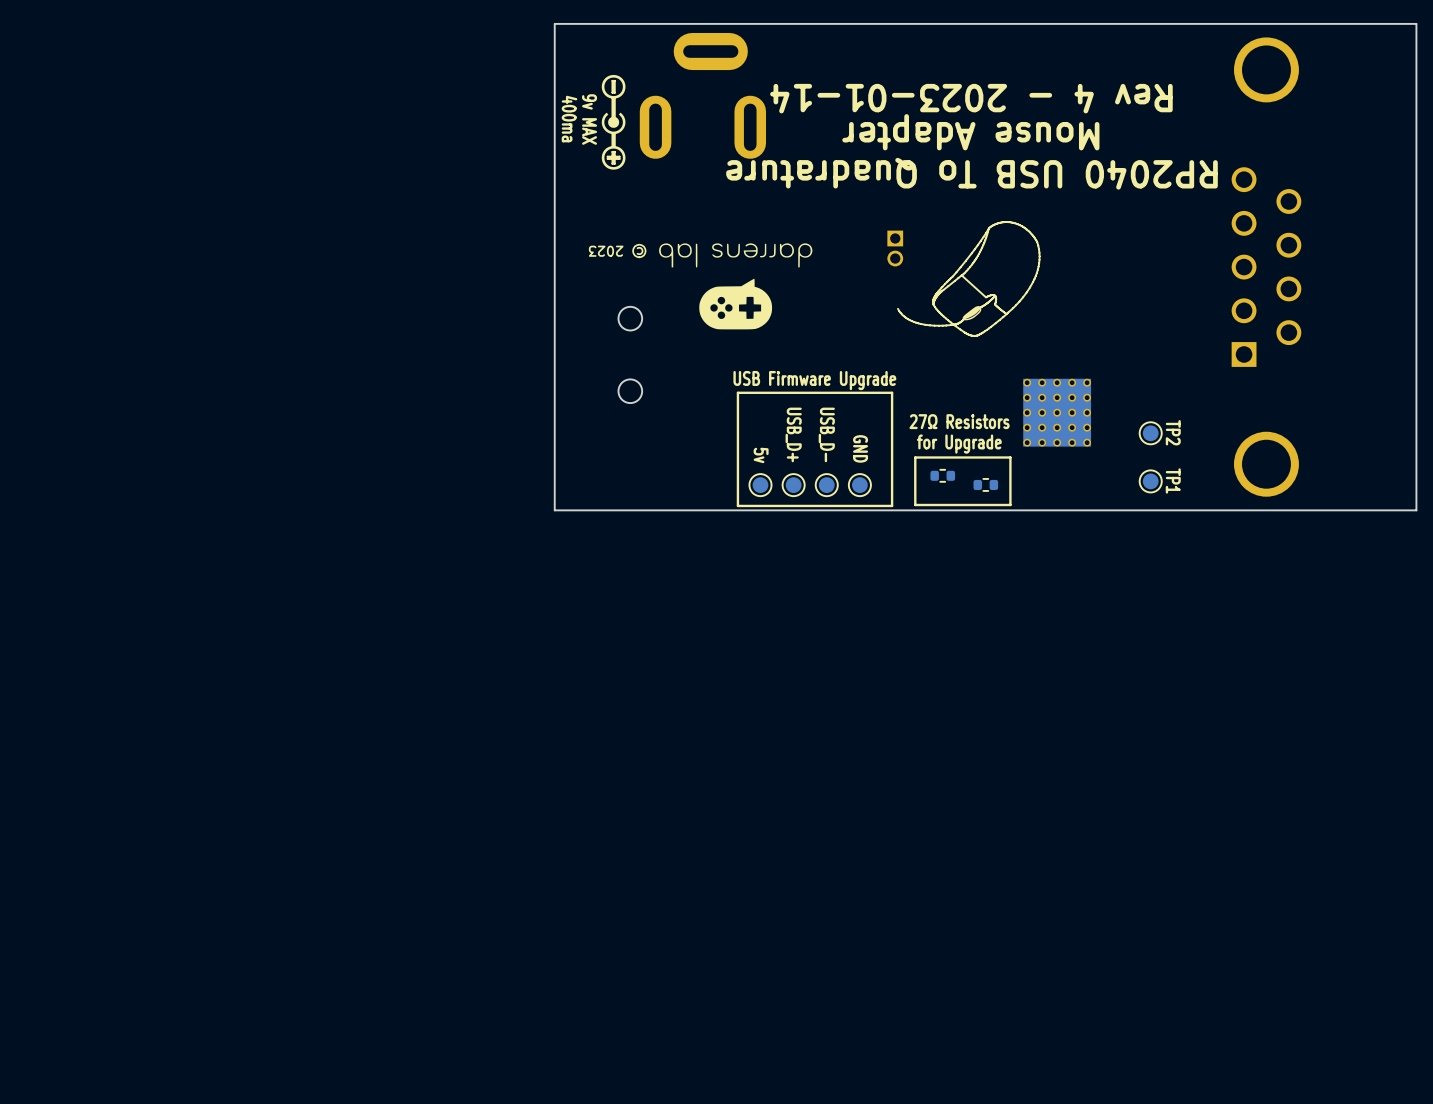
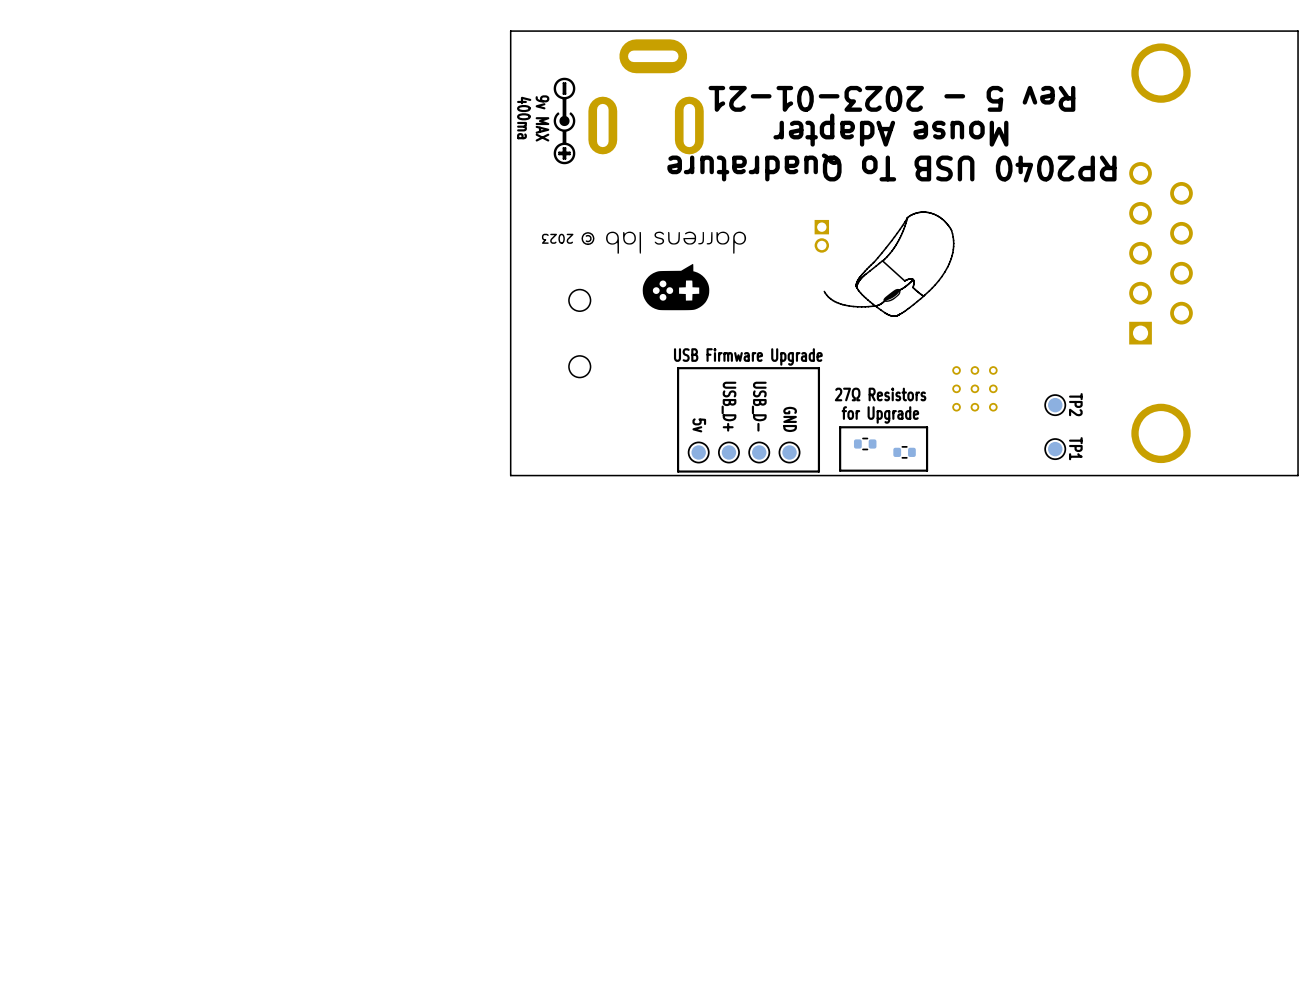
text: Rev 4 - 2023-01-14 (971, 98) -> Rev 5 - 2023-01-21 (891, 98)
part footprint: [1023, 378, 1092, 447] -> [952, 366, 998, 412]

